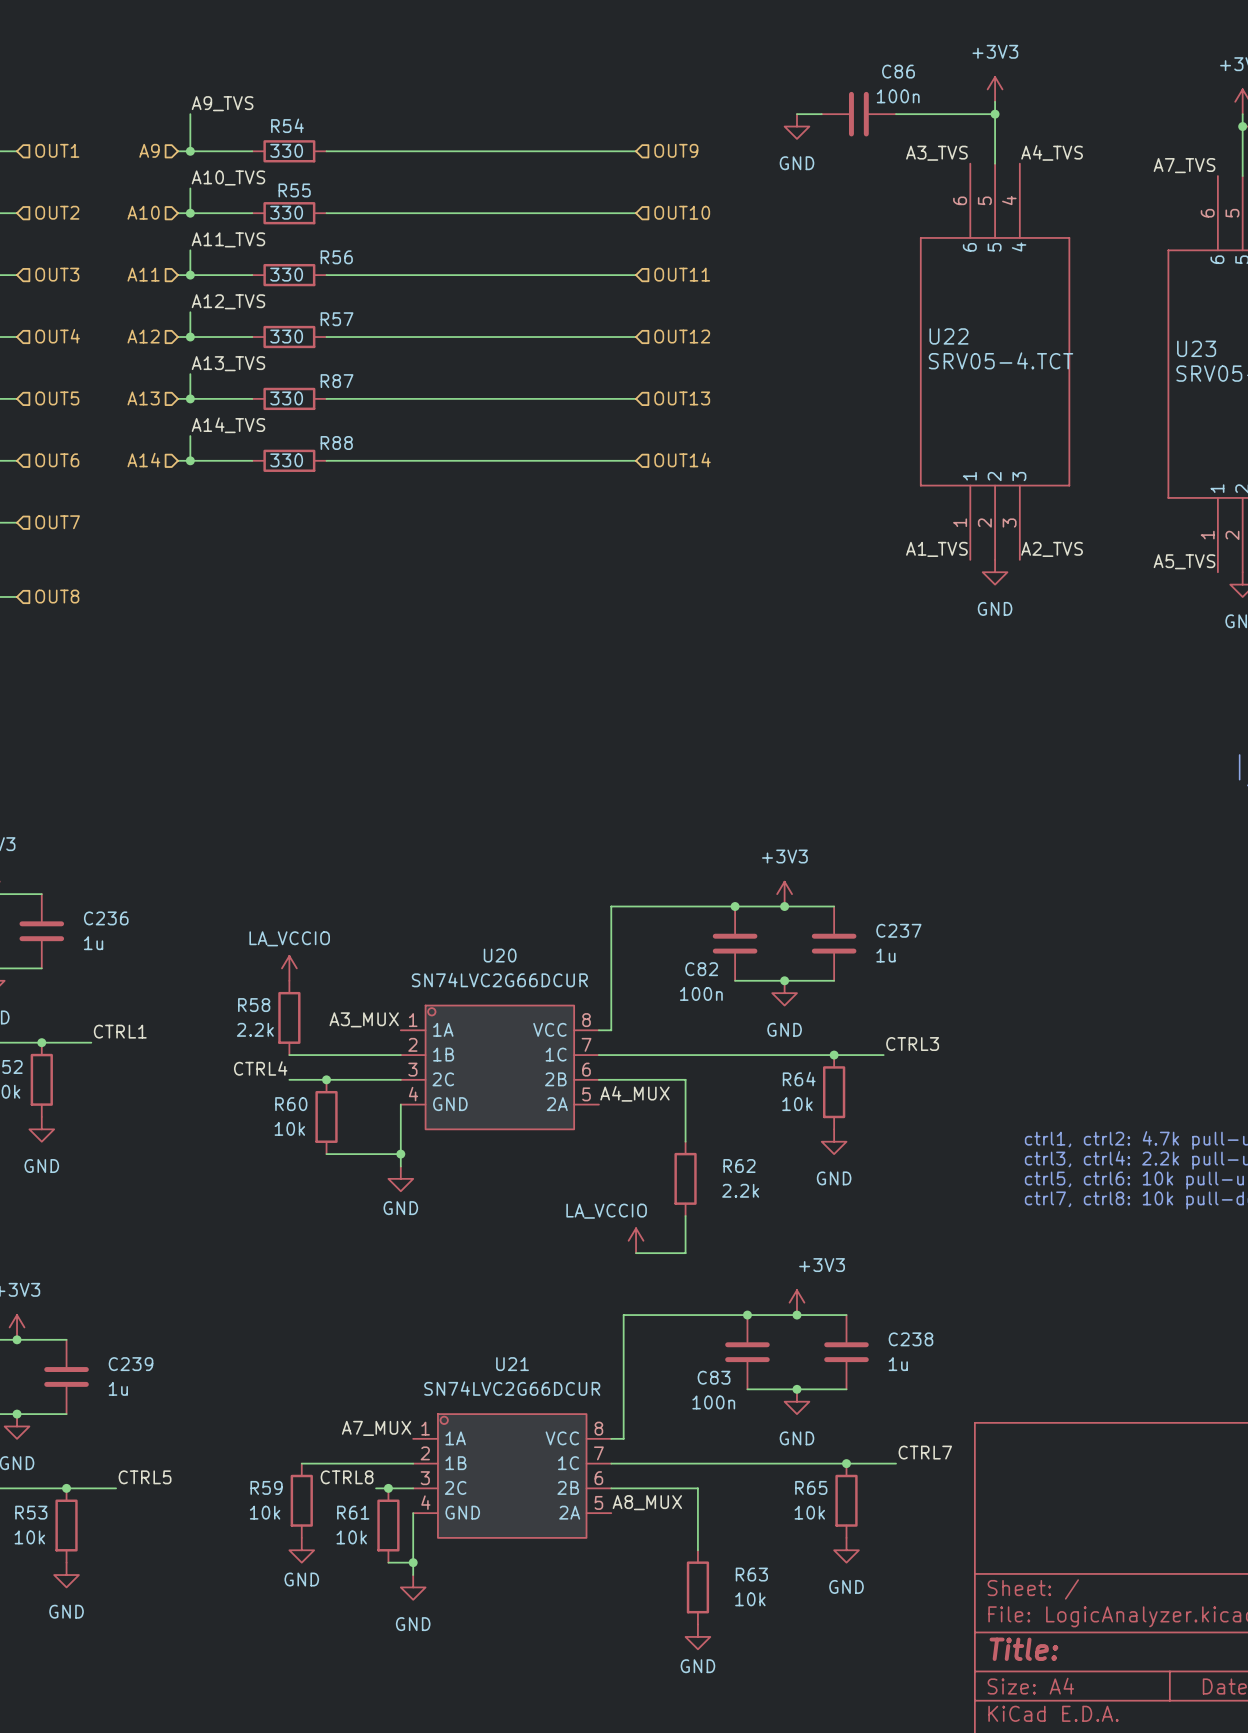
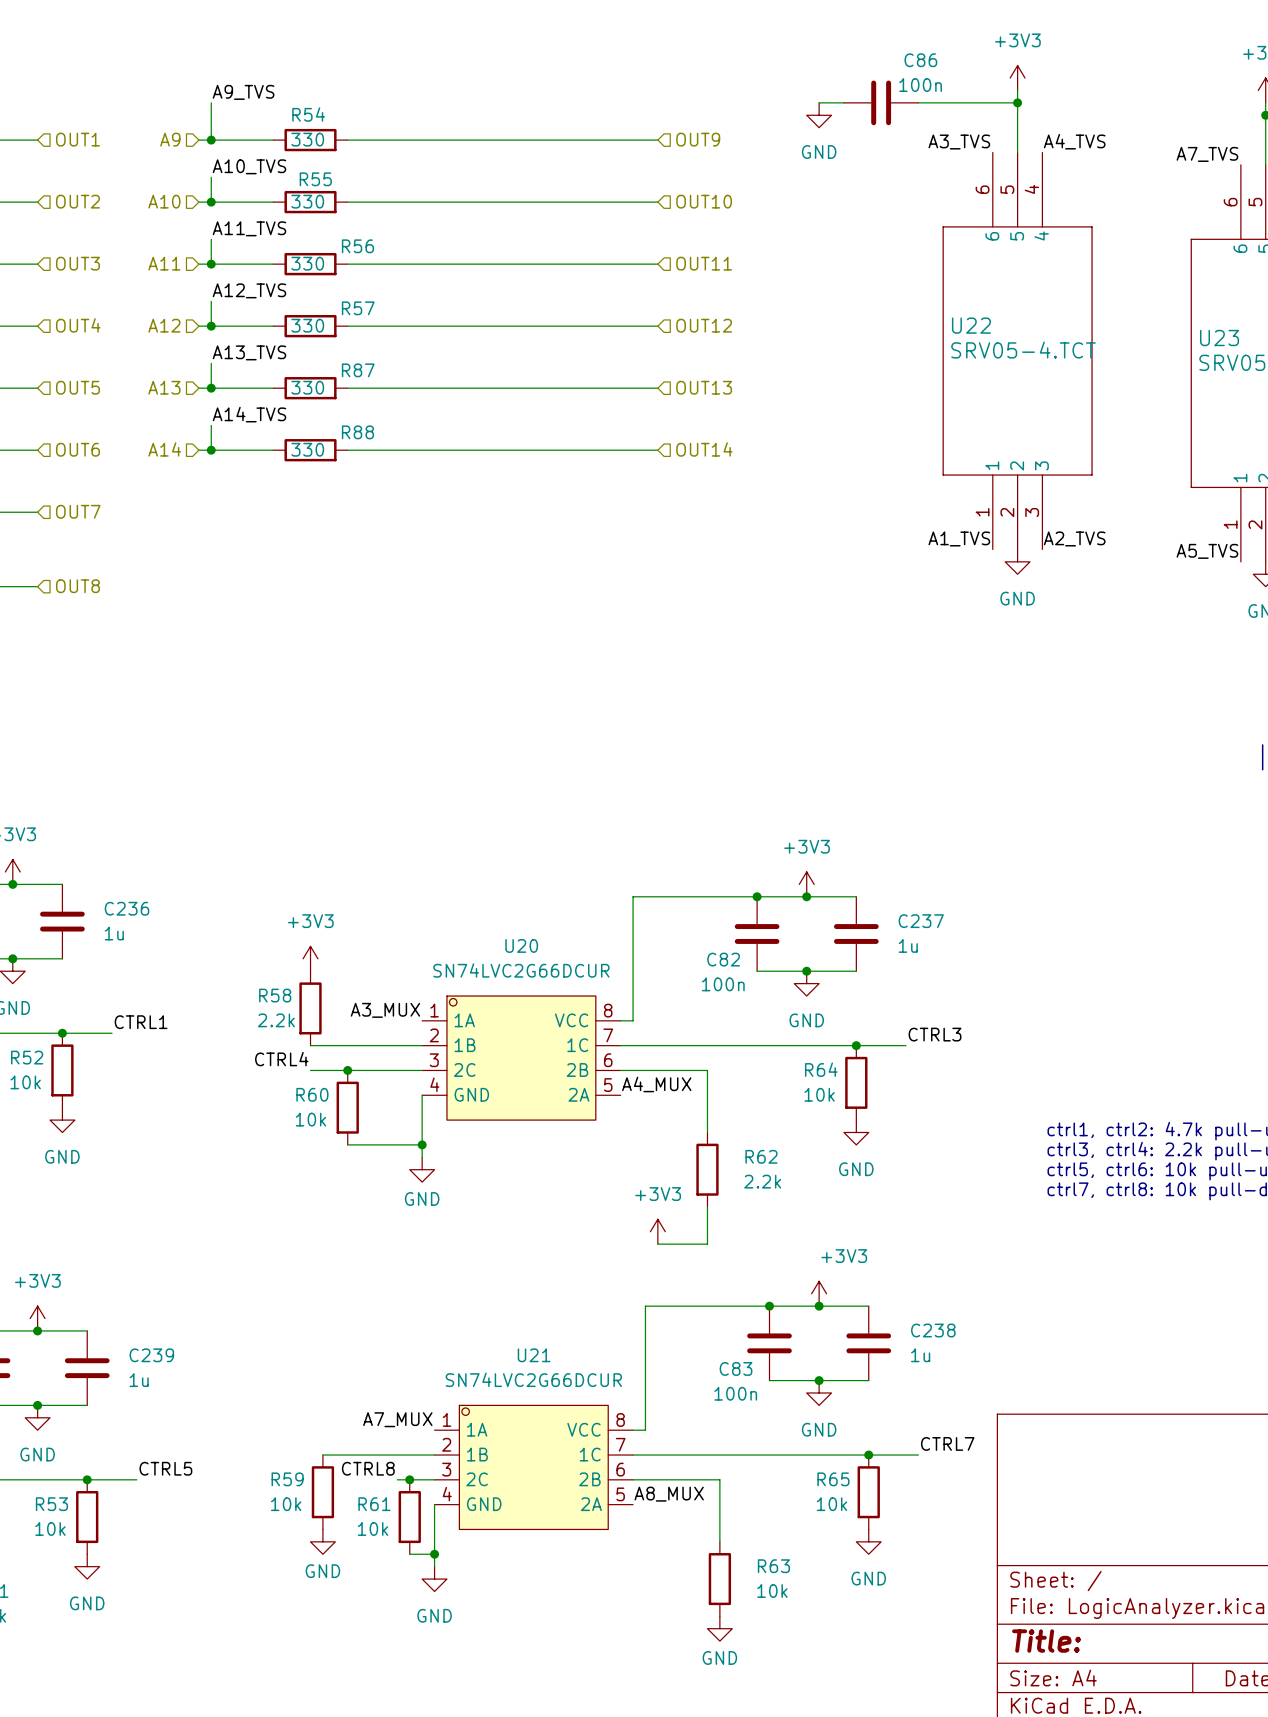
power symbol: LA_VCCIO (289, 968) -> +3V3 (310, 958)
power symbol: LA_VCCIO (636, 1240) -> +3V3 (657, 1231)

